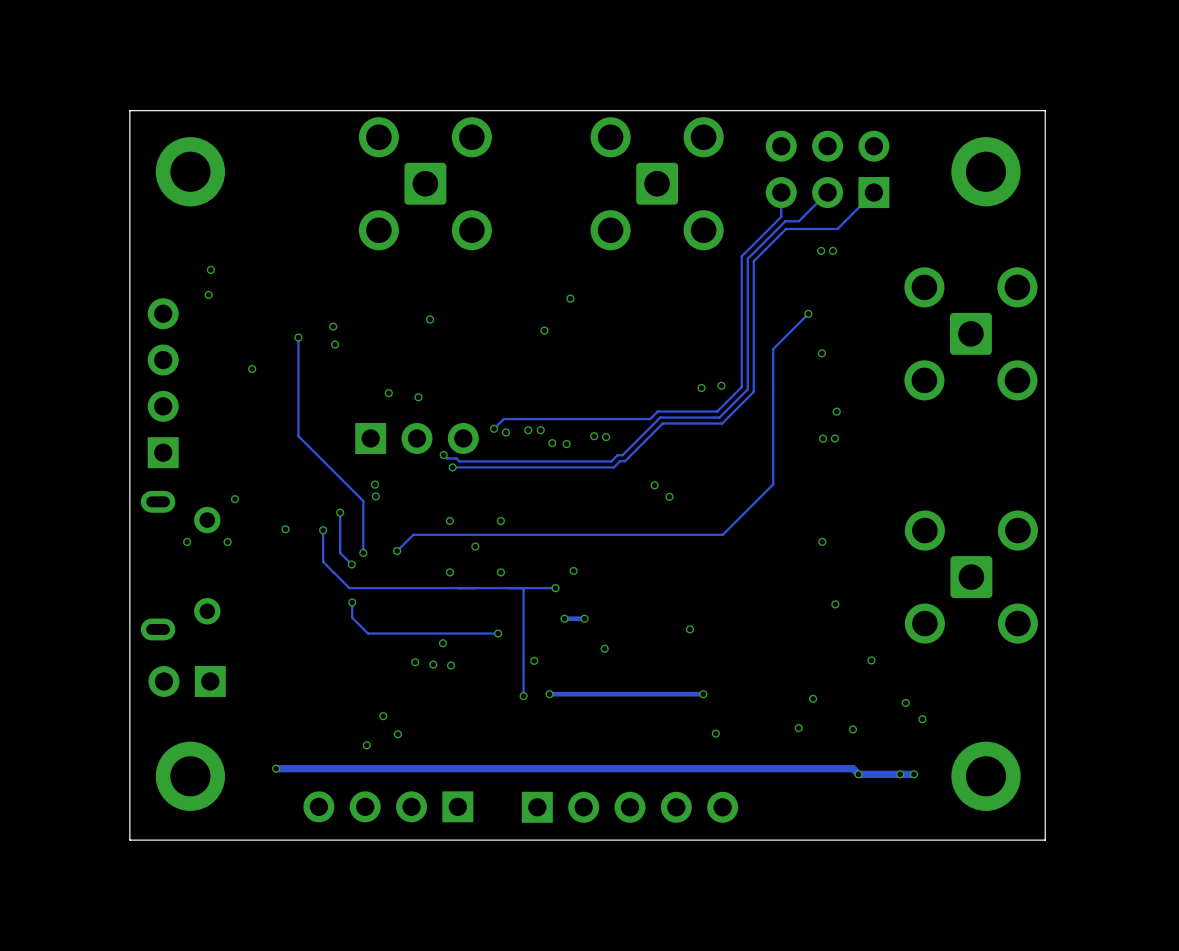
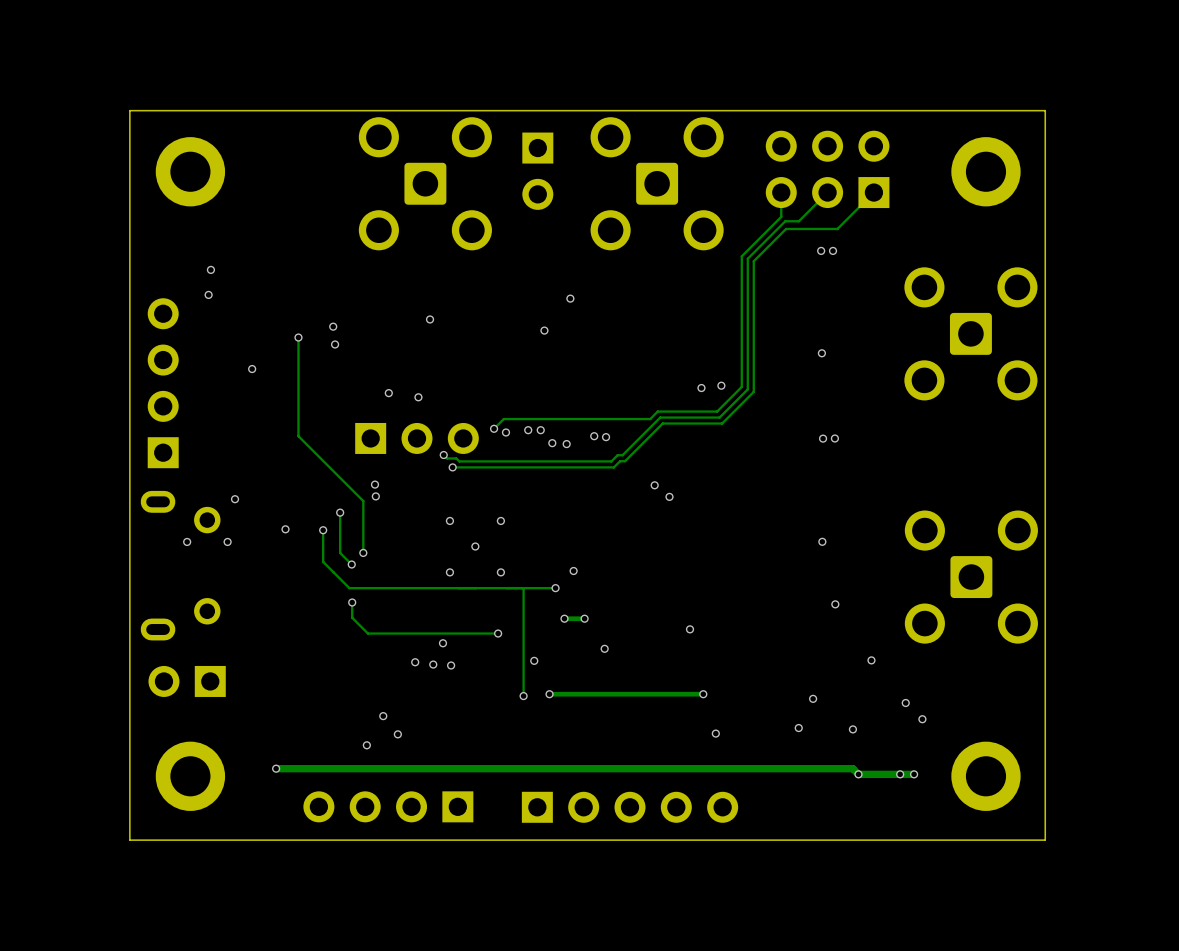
part: none -> (537, 171)
track: (808, 313) (773, 349) (773, 484) (722, 534) (413, 534) (397, 551) -> none
via: (808, 313) -> none
via: (836, 411) -> none
via: (397, 551) -> none

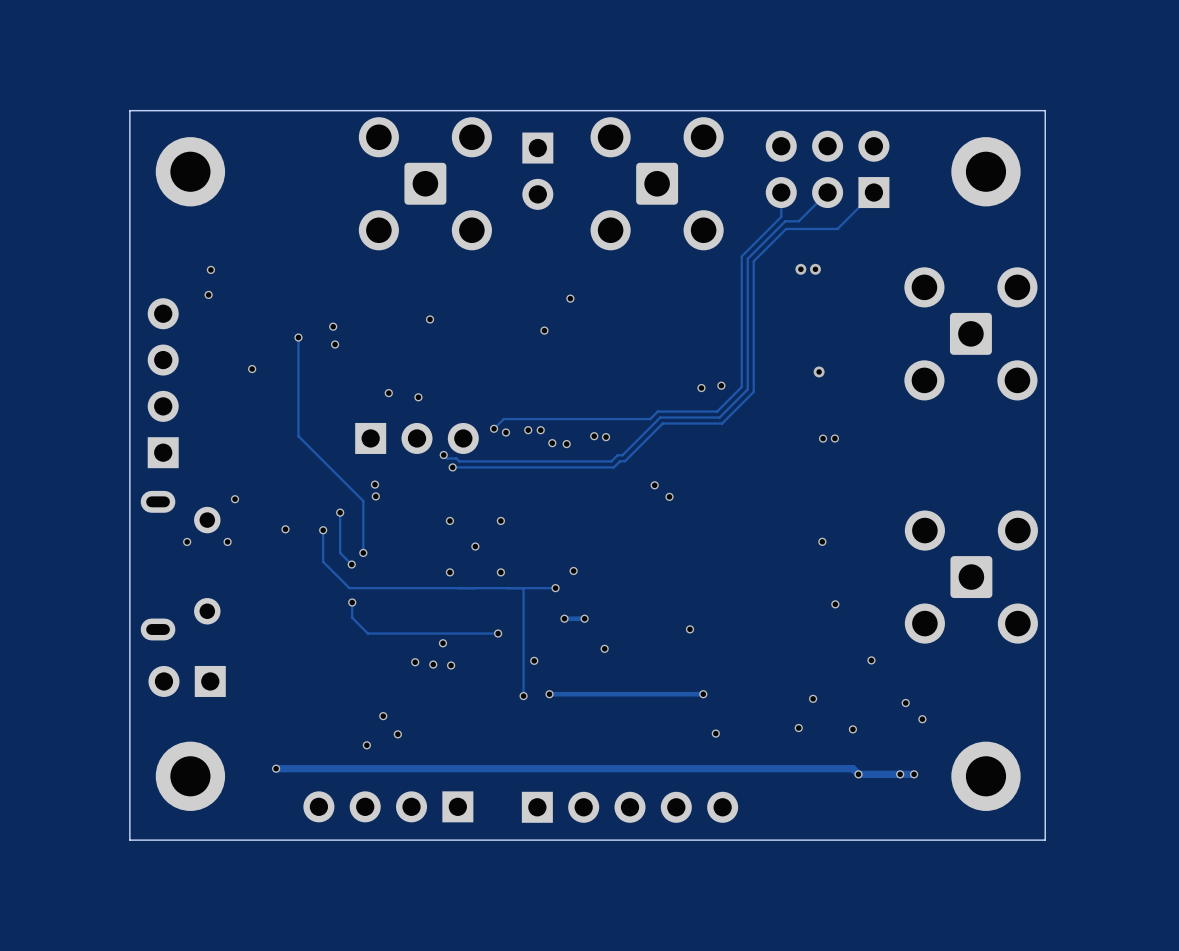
via: (821, 250) -> none
via: (833, 250) -> none
via: none -> (800, 269)
via: none -> (815, 269)
via: (821, 353) -> none
via: none -> (819, 371)

